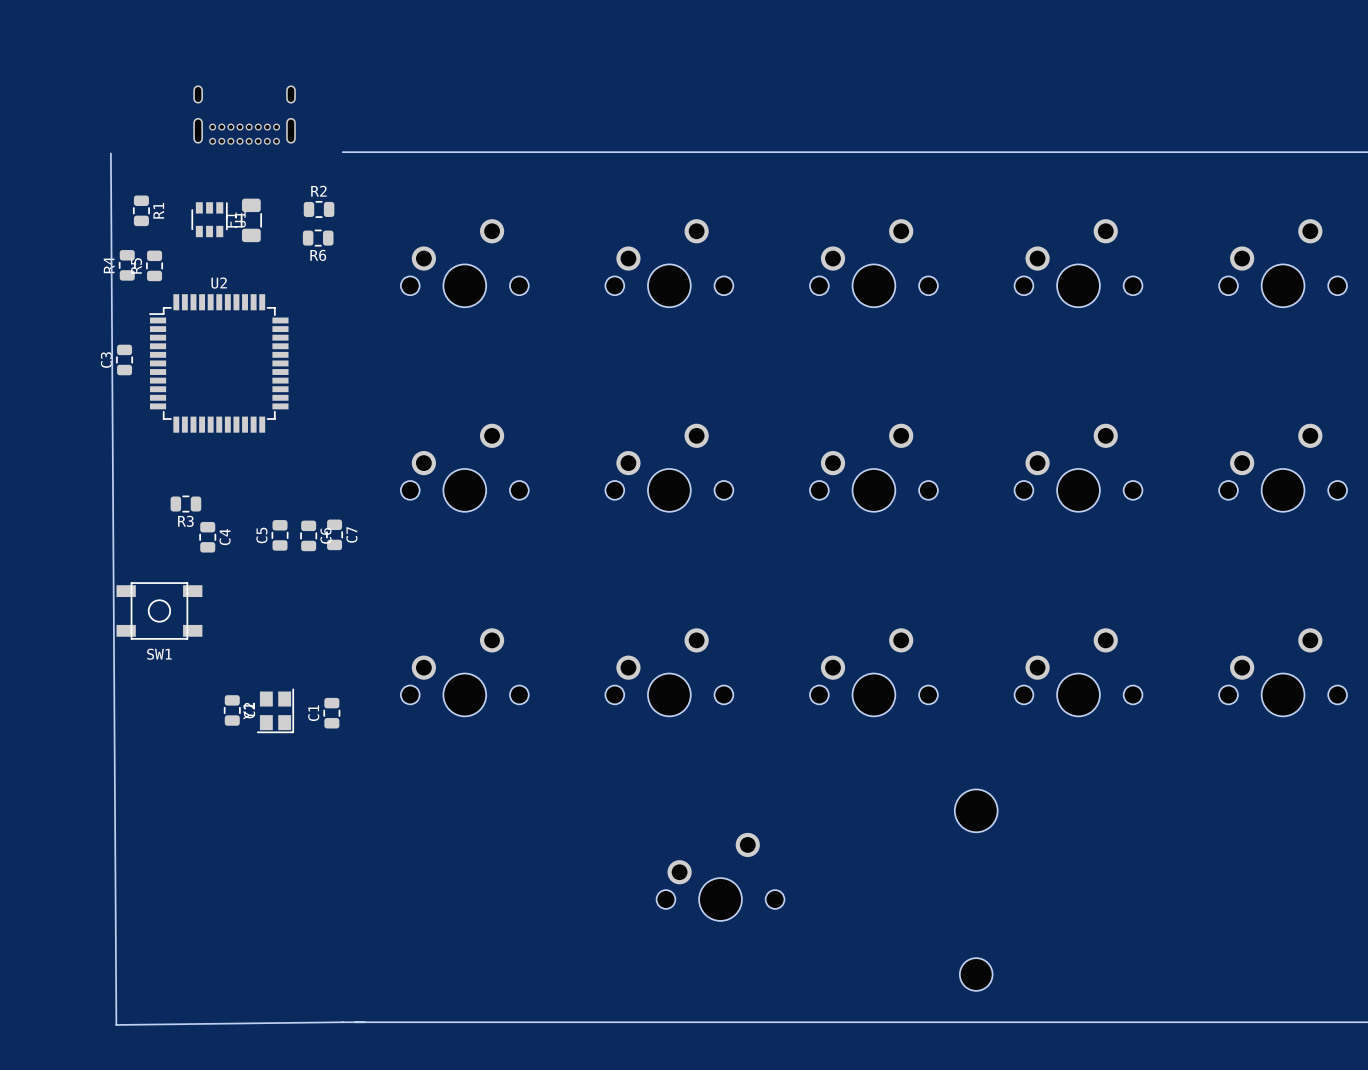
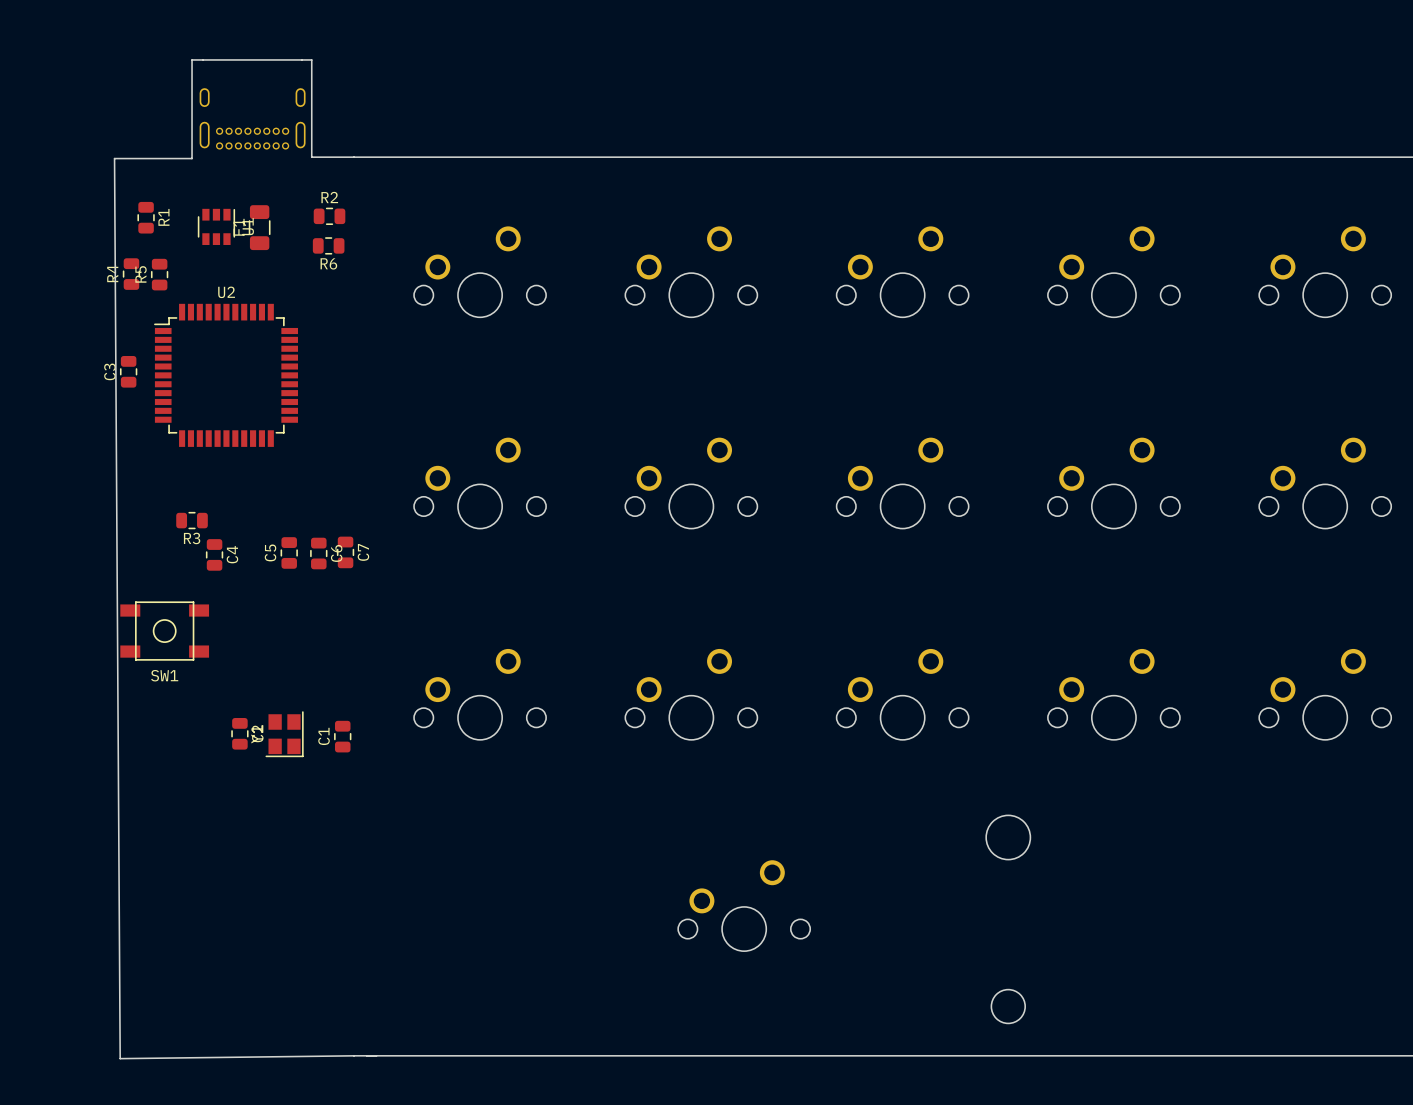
board edge: none -> (354, 157) (311, 157) (311, 59) (192, 59) (192, 158) (114, 158)

